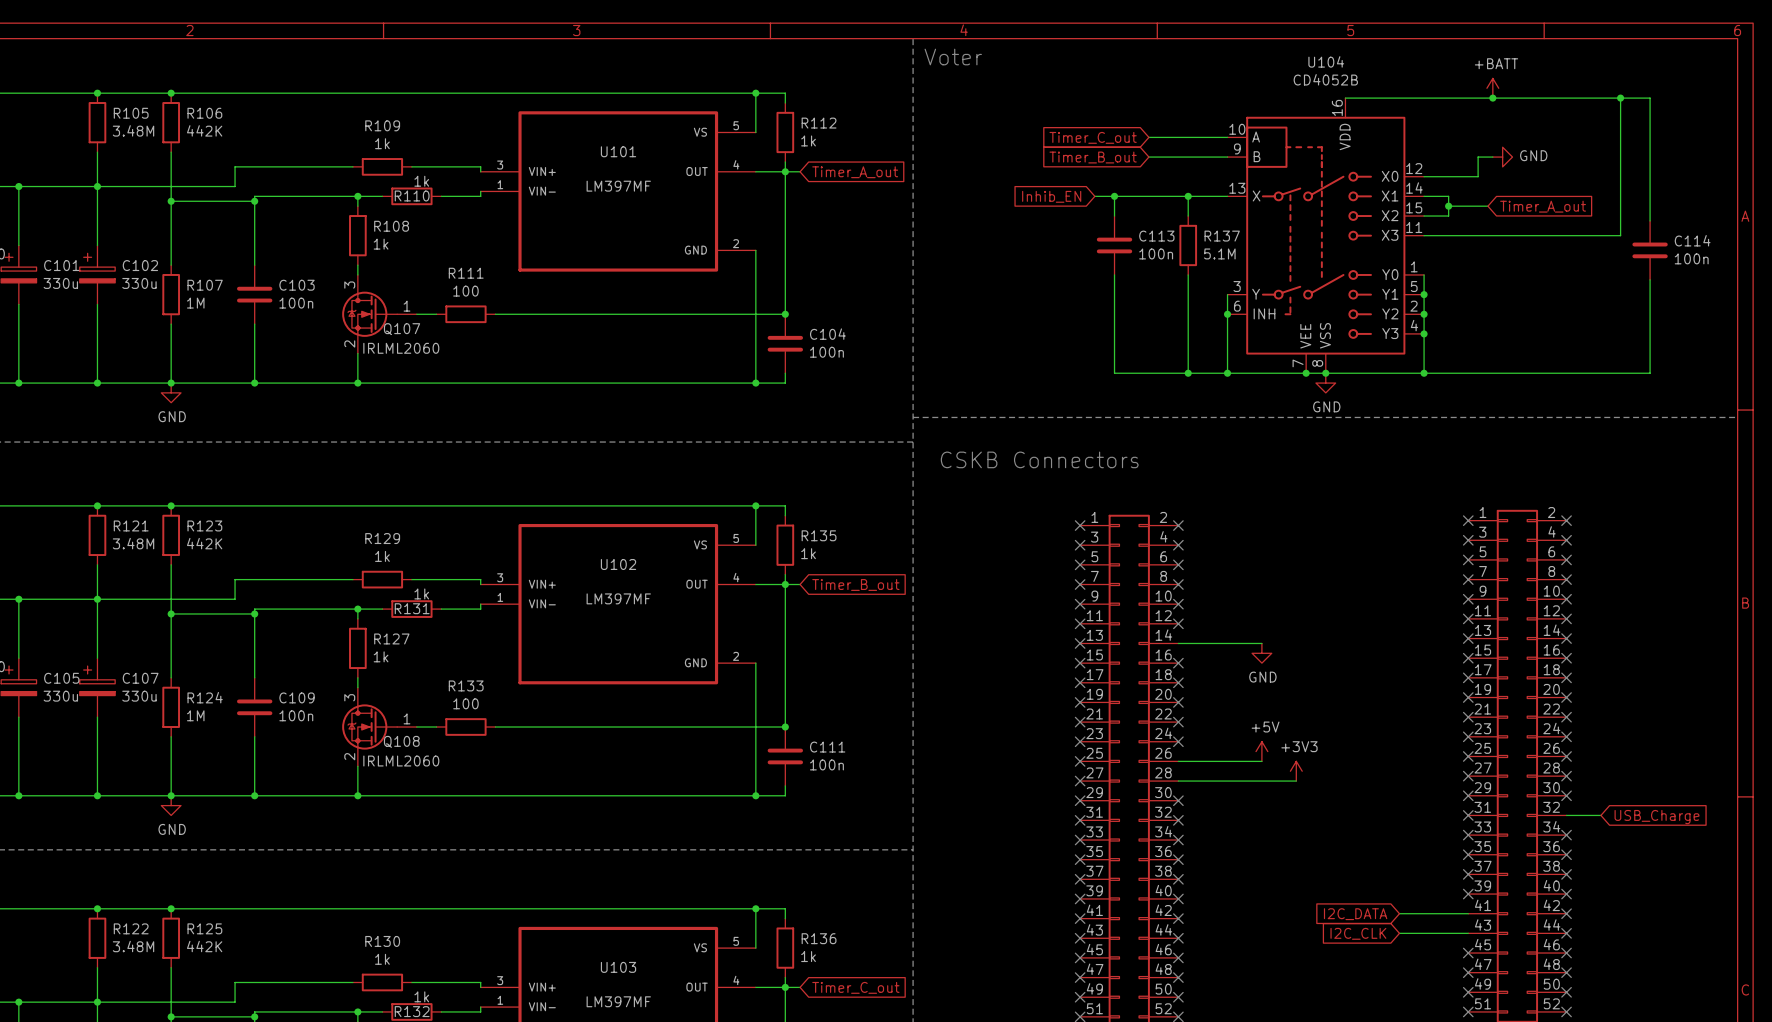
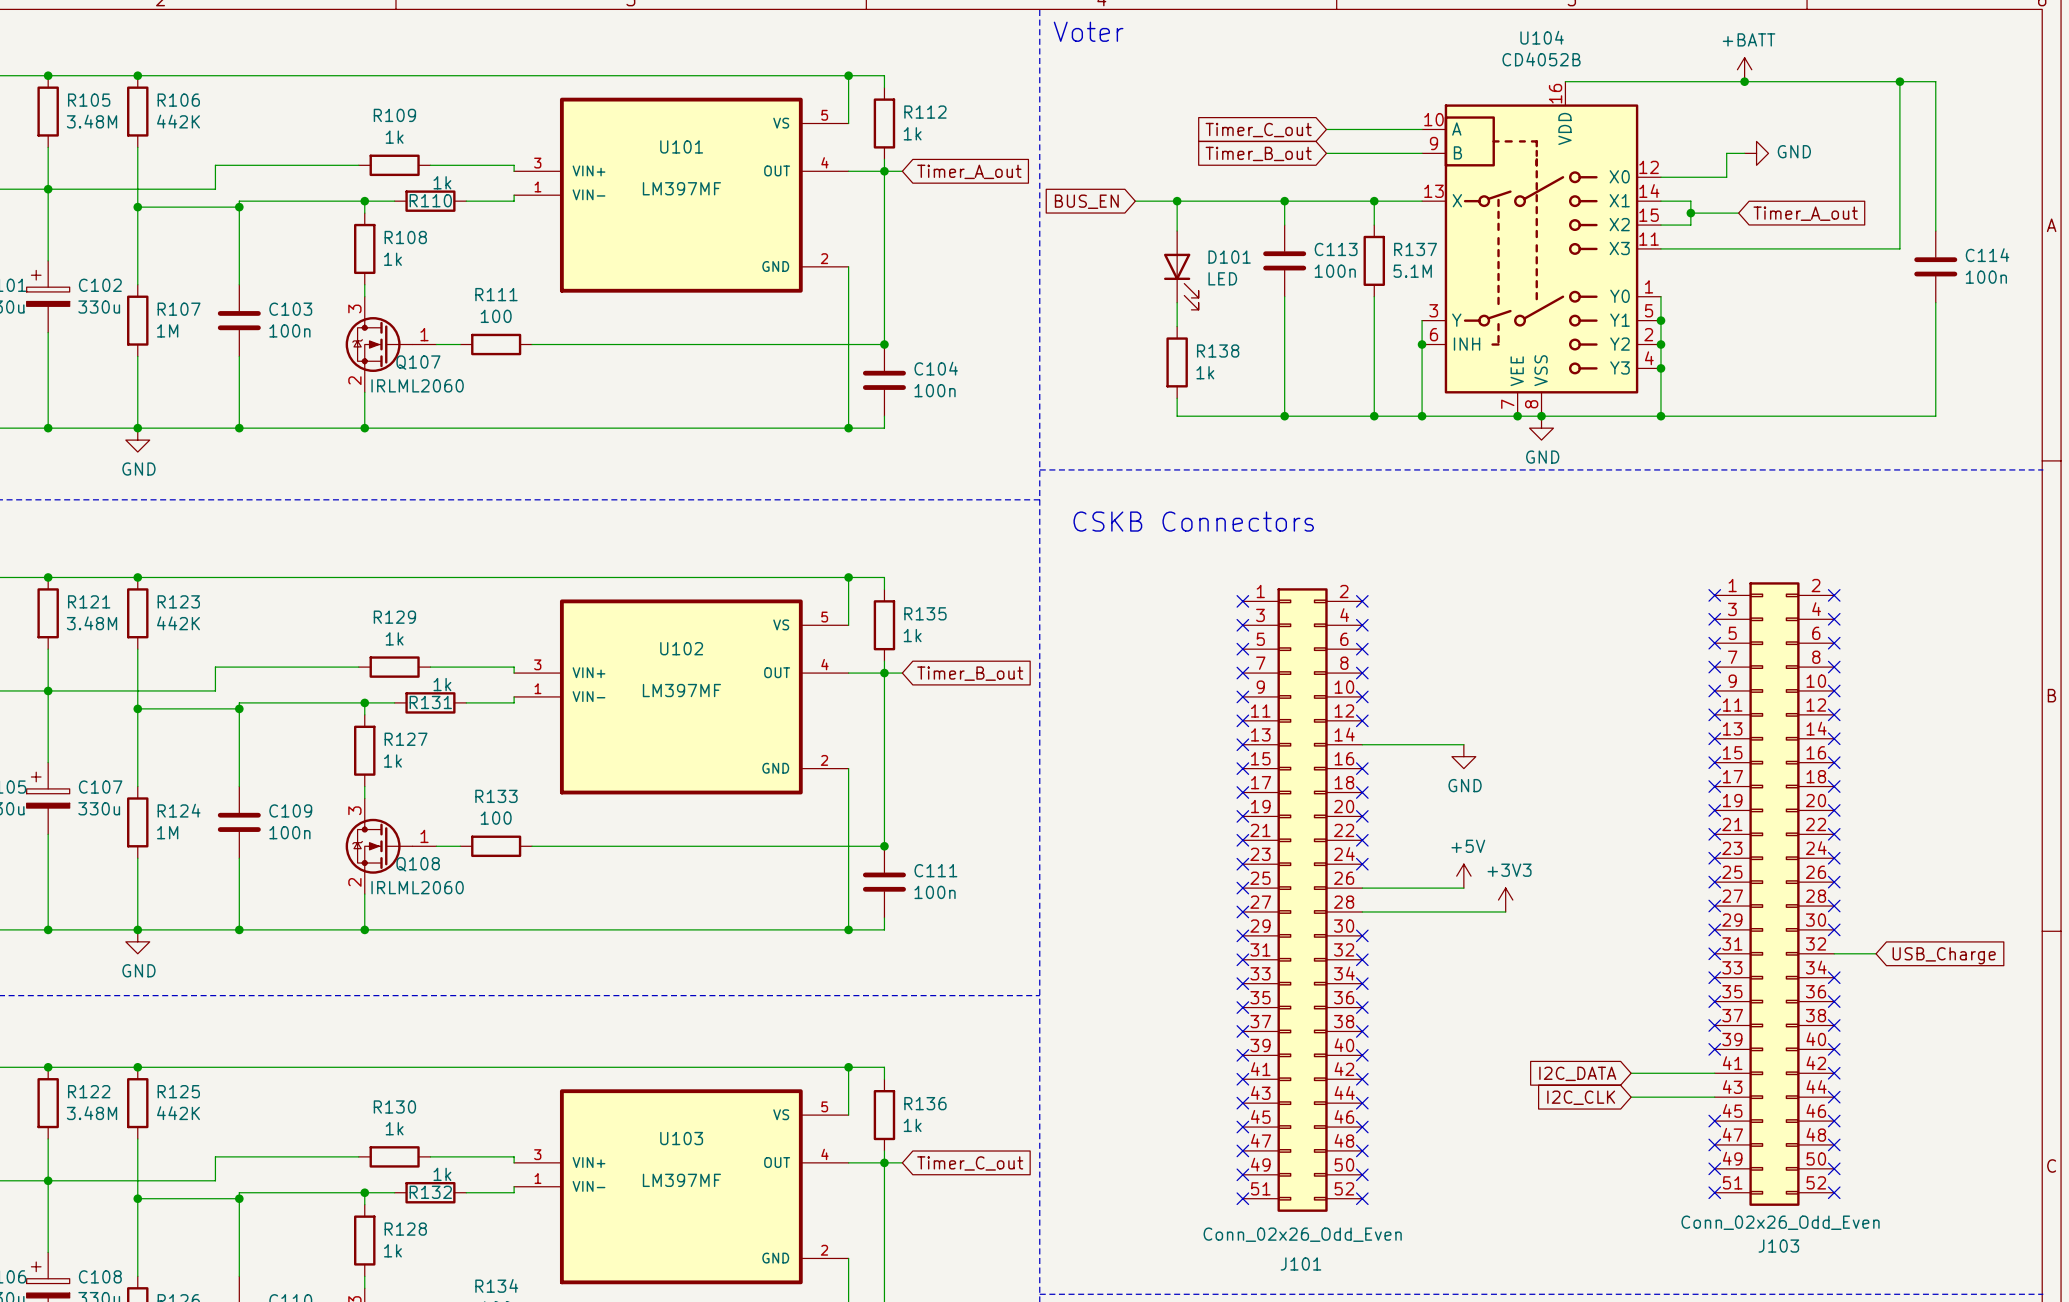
global label: none -> BUS_EN (1086, 201)
wire: none -> (1135, 201) (1260, 201)
wire: none -> (1177, 201) (1177, 231)
junction: none -> (1177, 201)
global label: Inhib_EN (1051, 196) -> none
D101: none -> LED (1181, 270)
wire: none -> (1177, 302) (1177, 326)
R138: none -> 1k (1177, 362)
wire: none -> (1177, 398) (1177, 416) (1284, 416)
junction: none -> (1284, 416)

